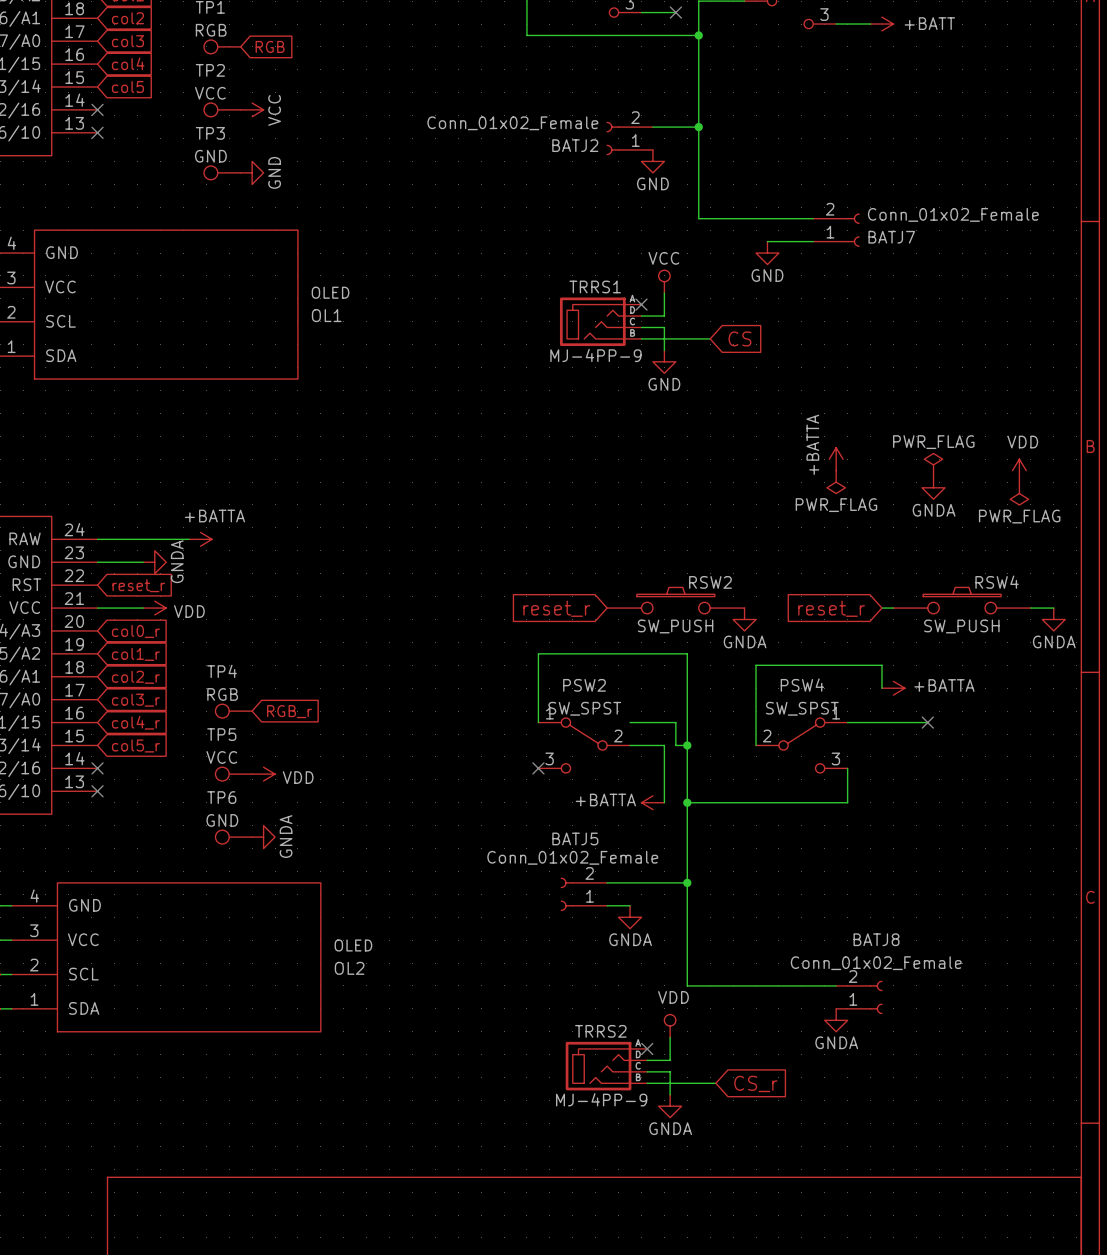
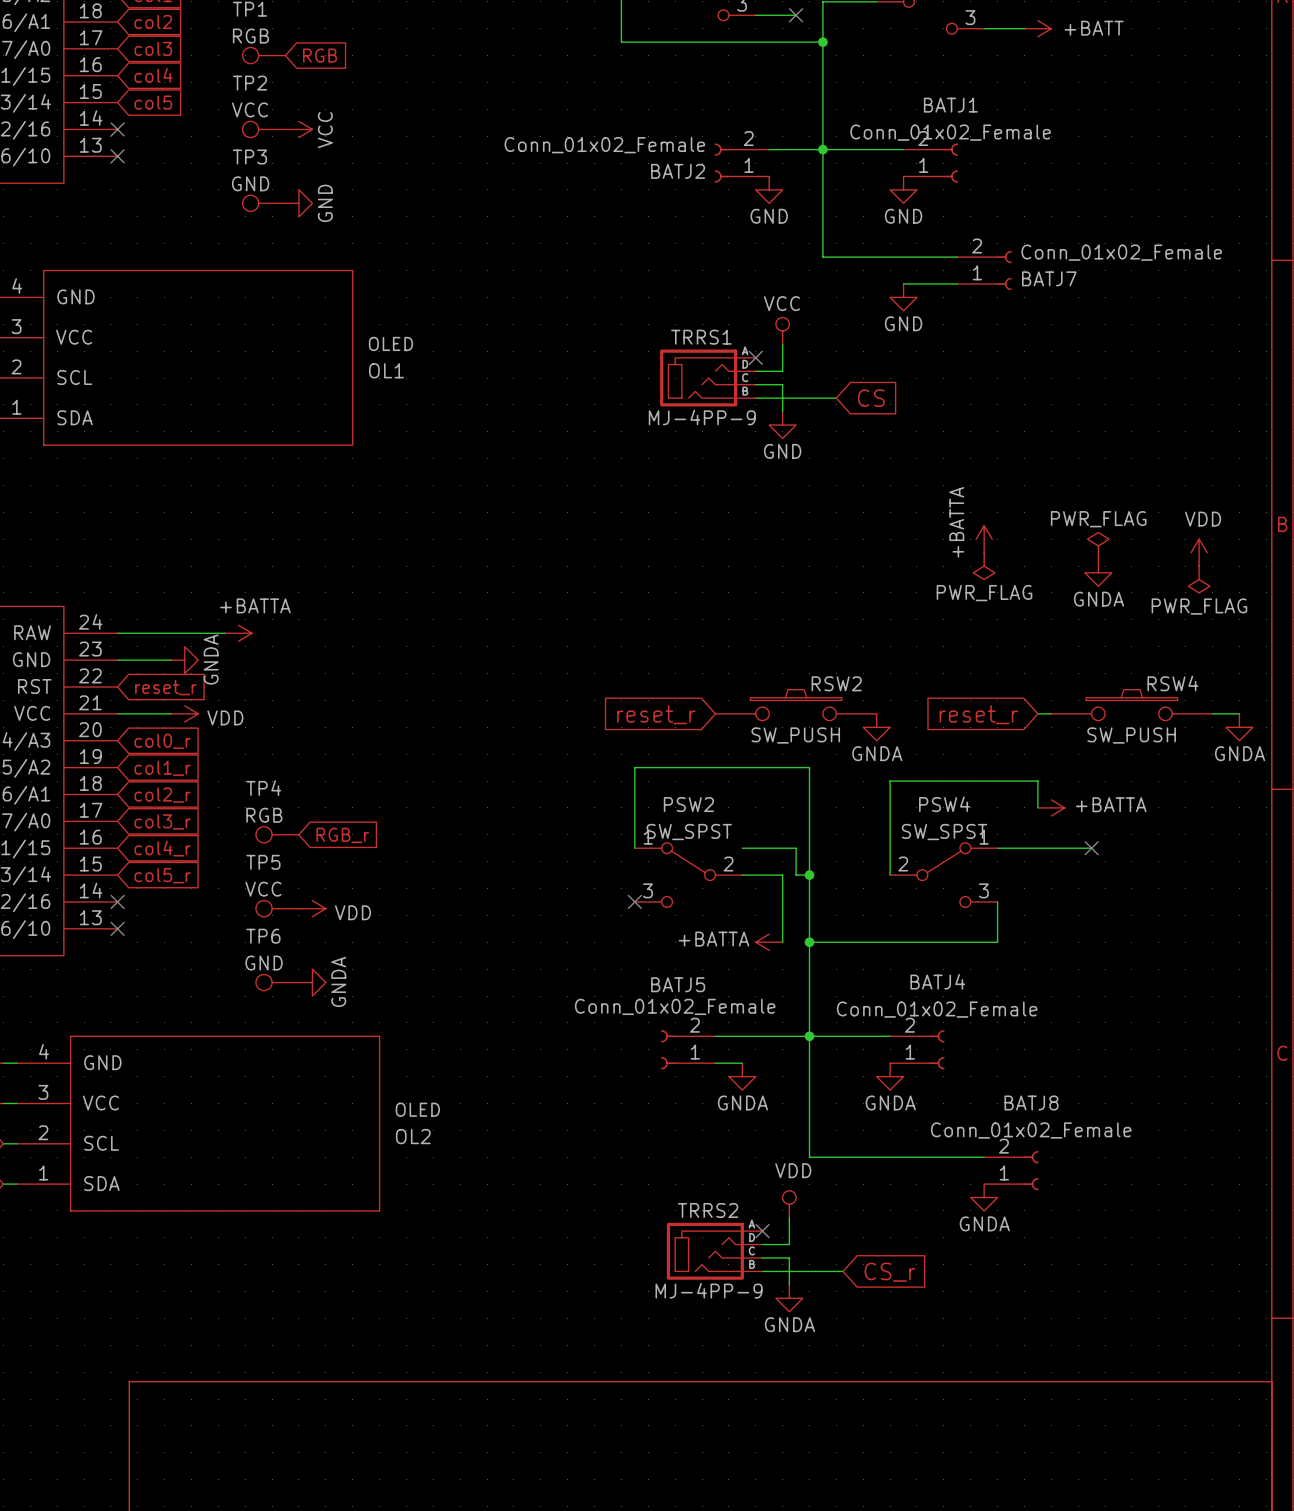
wire: none -> (822, 149) (903, 149)
BATJ1: none -> Conn_01x02_Female (930, 163)
power symbol: none -> GND (903, 189)
wire: none -> (809, 1036) (890, 1036)
BATJ4: none -> Conn_01x02_Female (917, 1049)
power symbol: none -> GNDA (890, 1076)

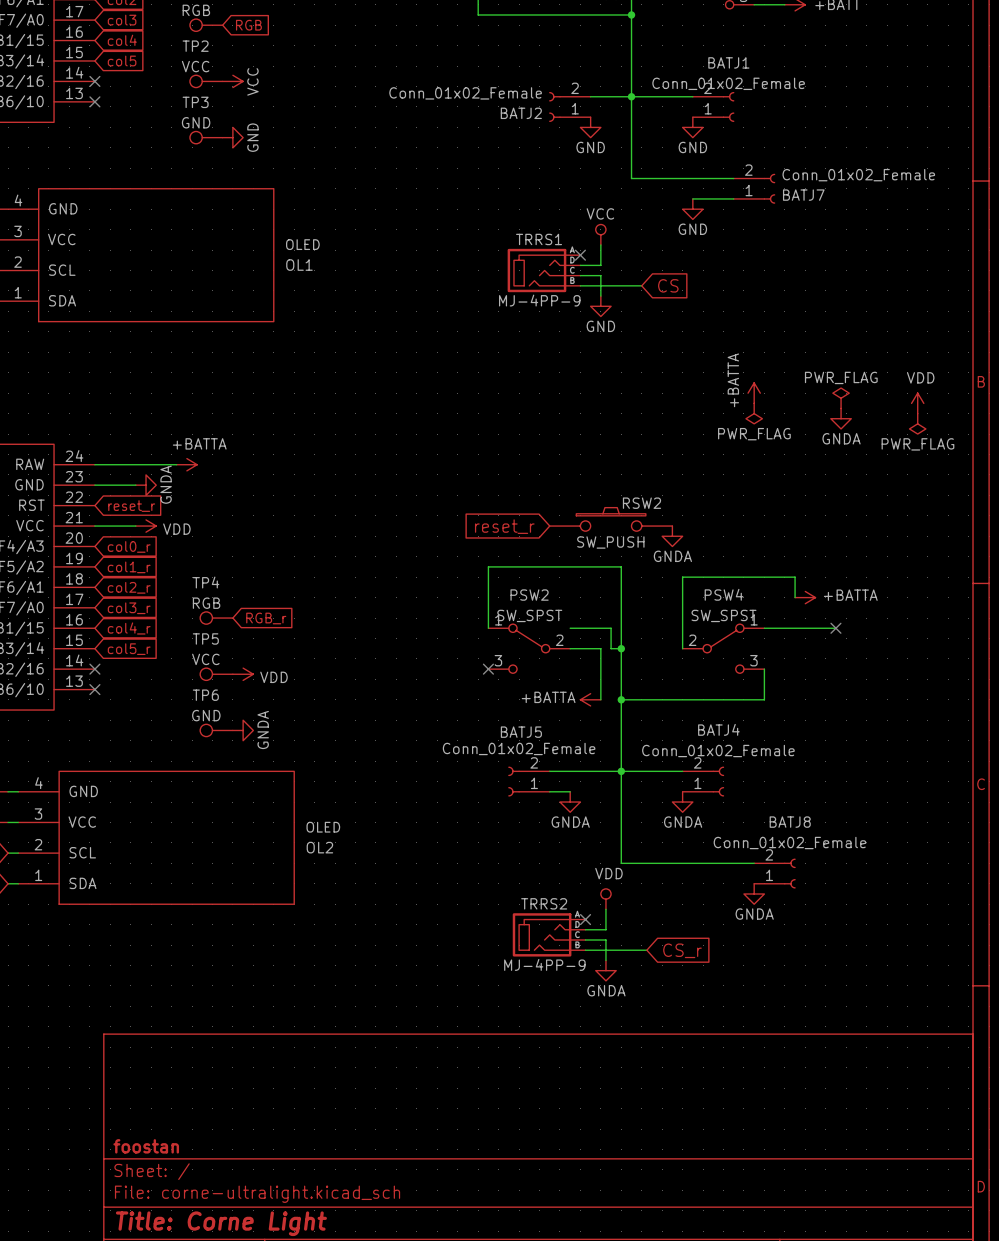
RSW4: SW_PUSH (1131, 705) -> none
wire: (1037, 713) (1051, 713) -> none
wire: (1212, 713) (1239, 713) -> none
global label: reset_r (978, 714) -> none
power symbol: GNDA (1239, 727) -> none

